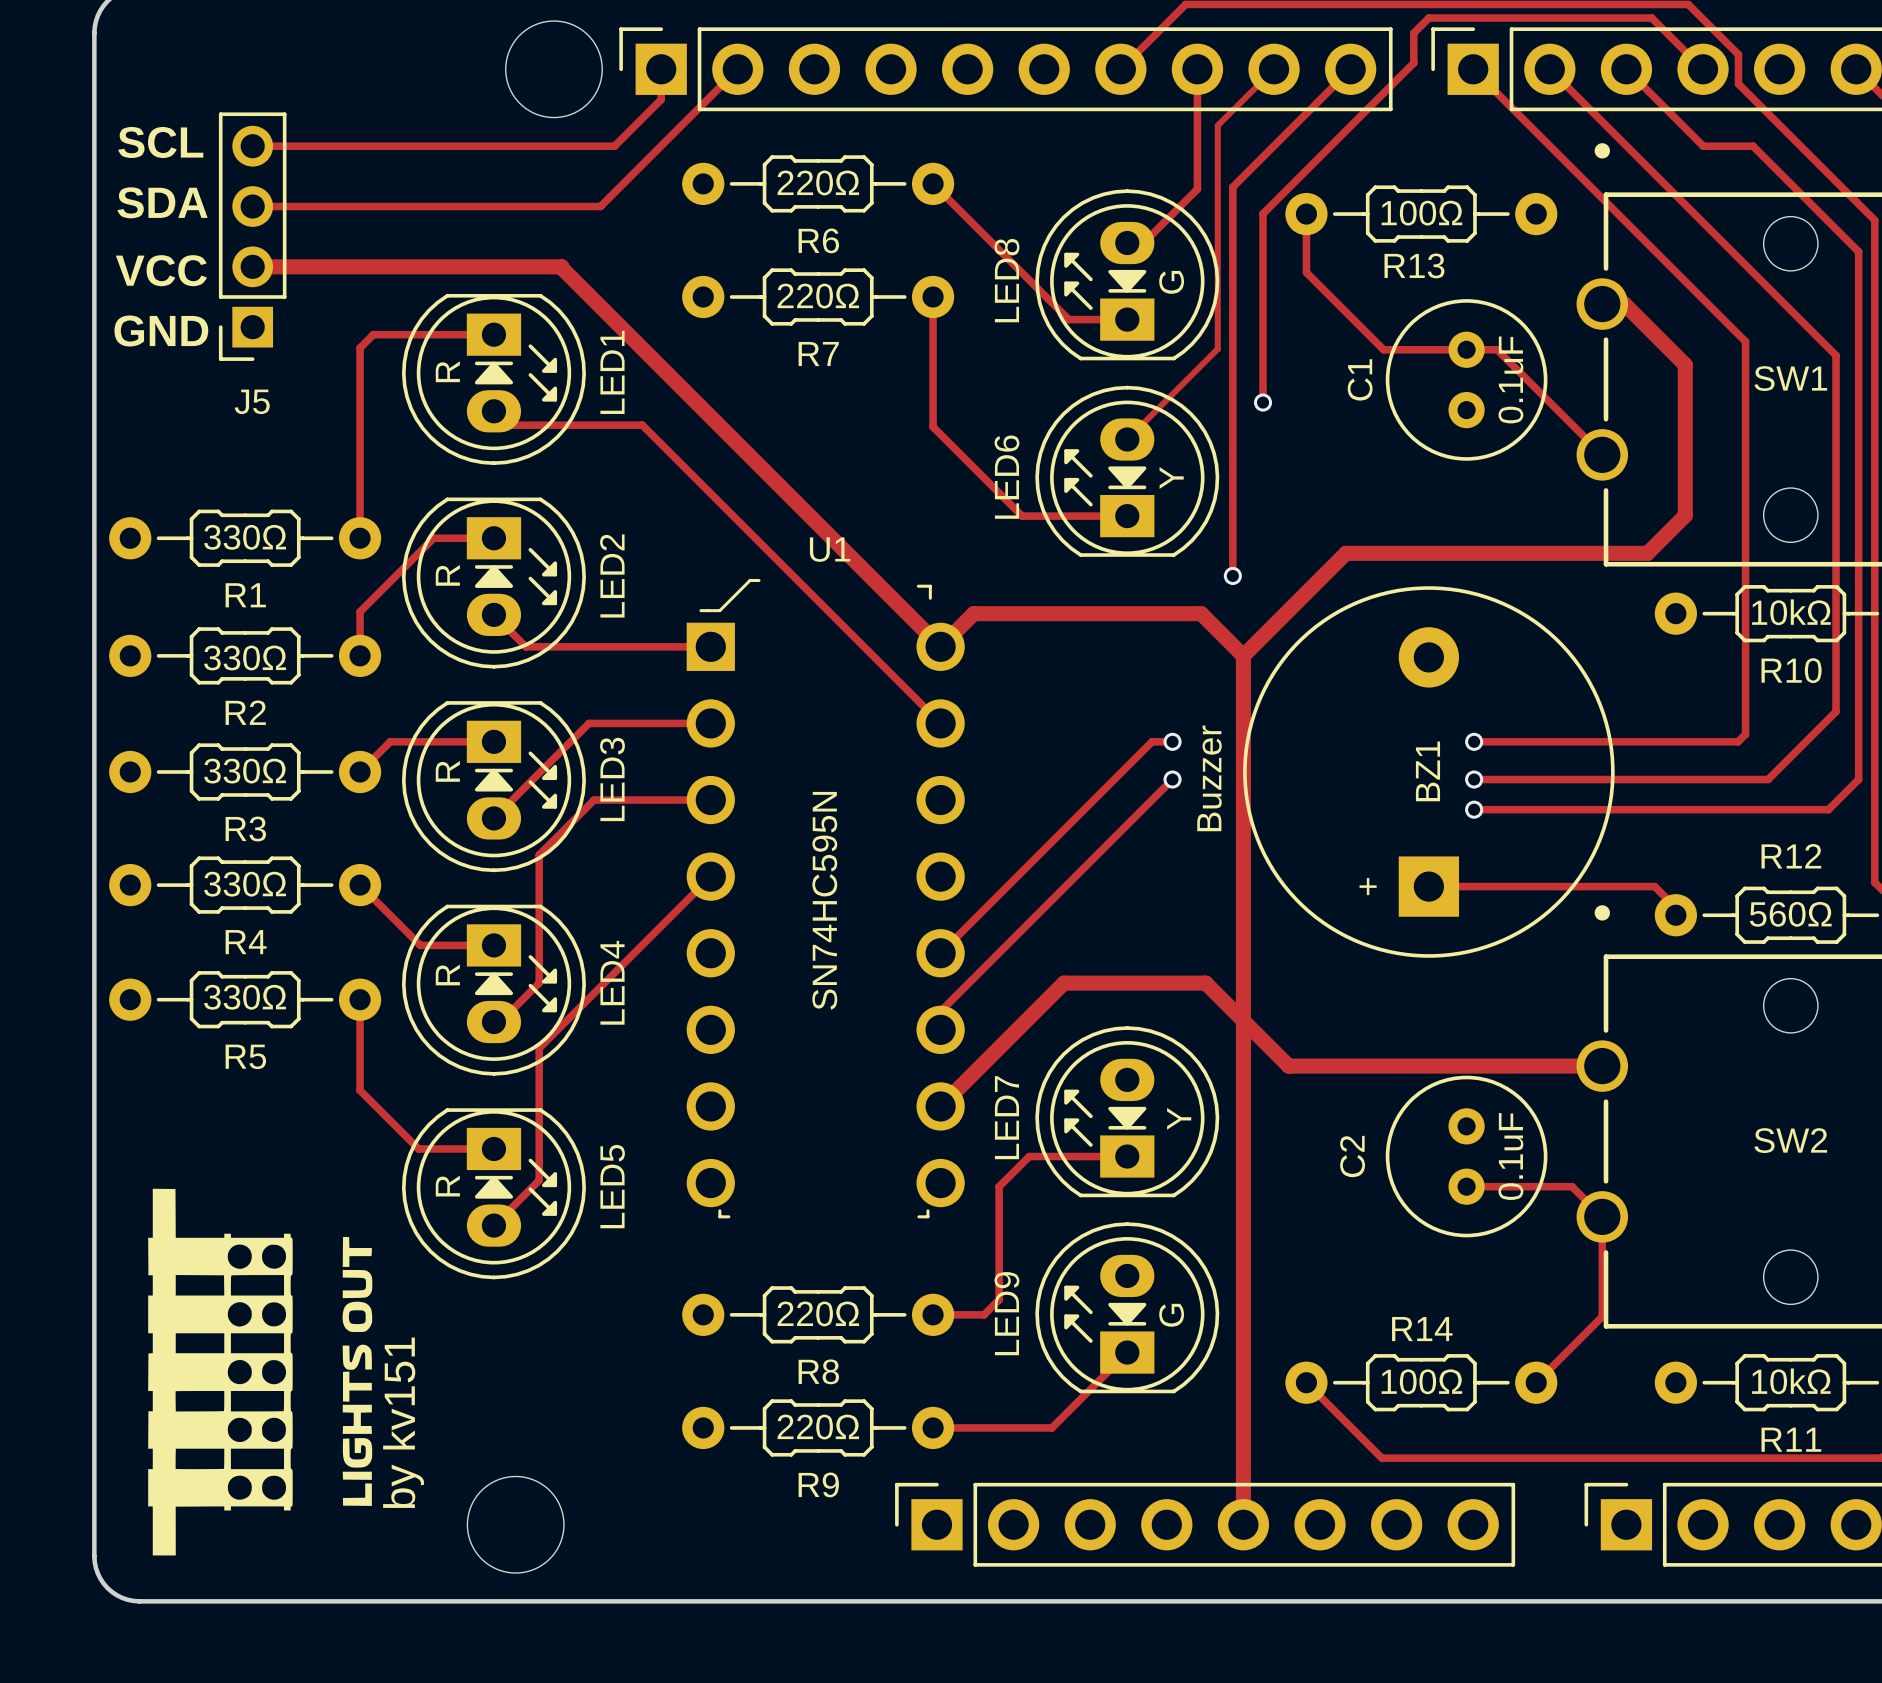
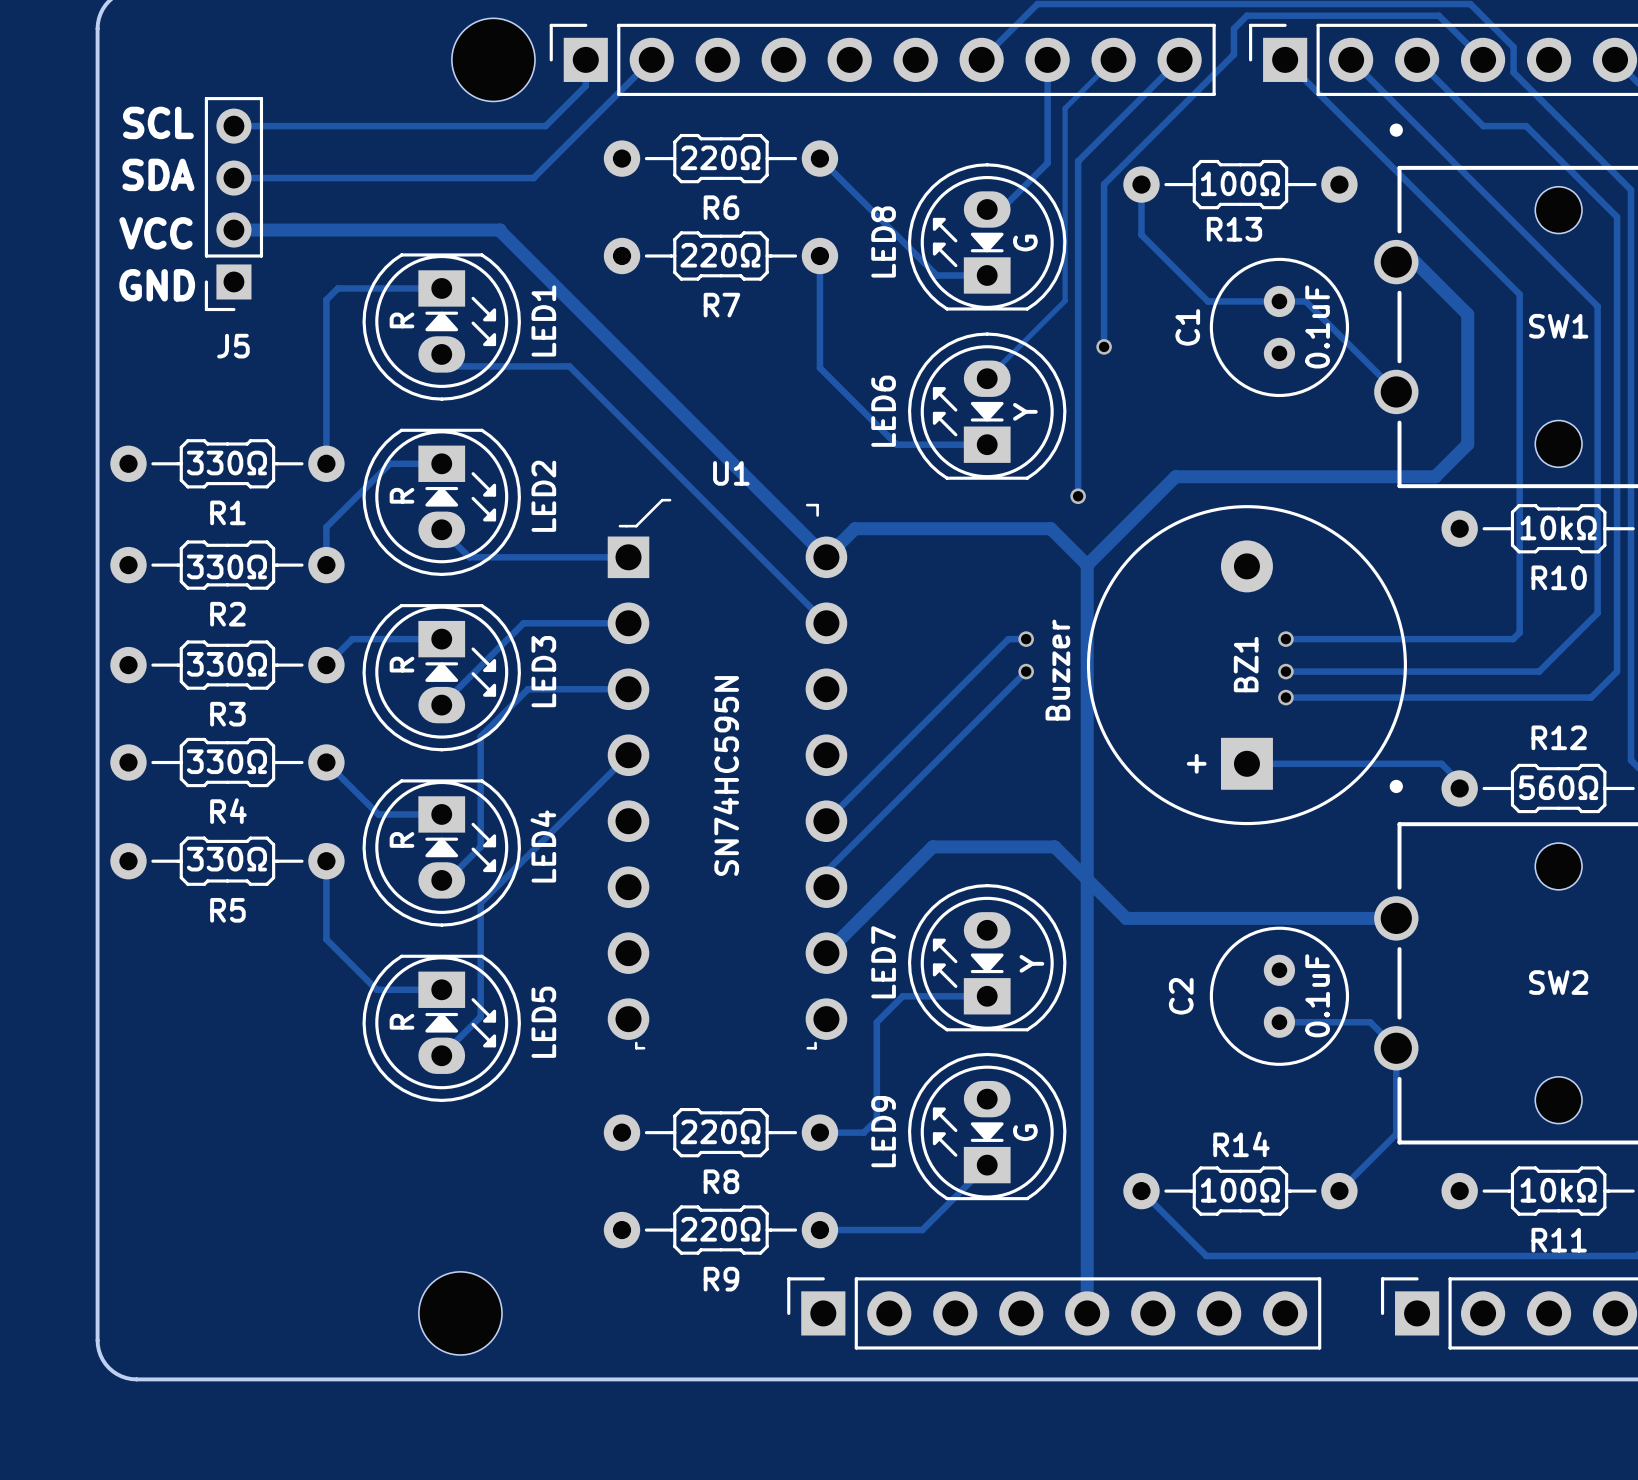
drawing: [148, 1188, 373, 1556] -> none
text: by kv151 (403, 1422) -> none

